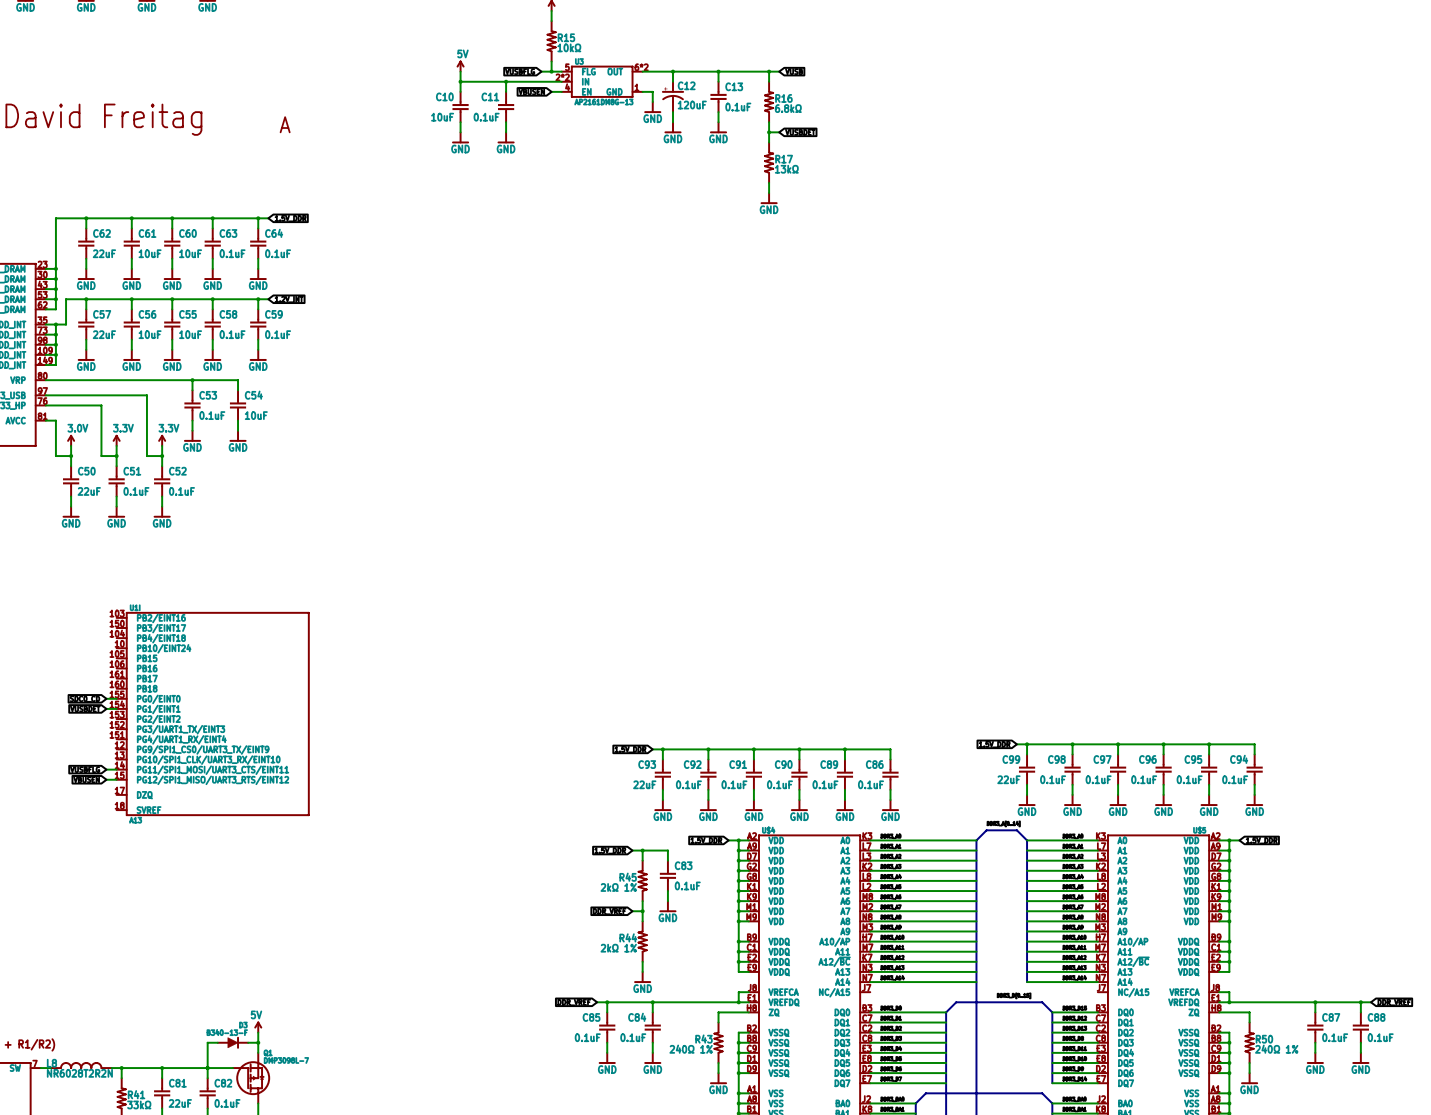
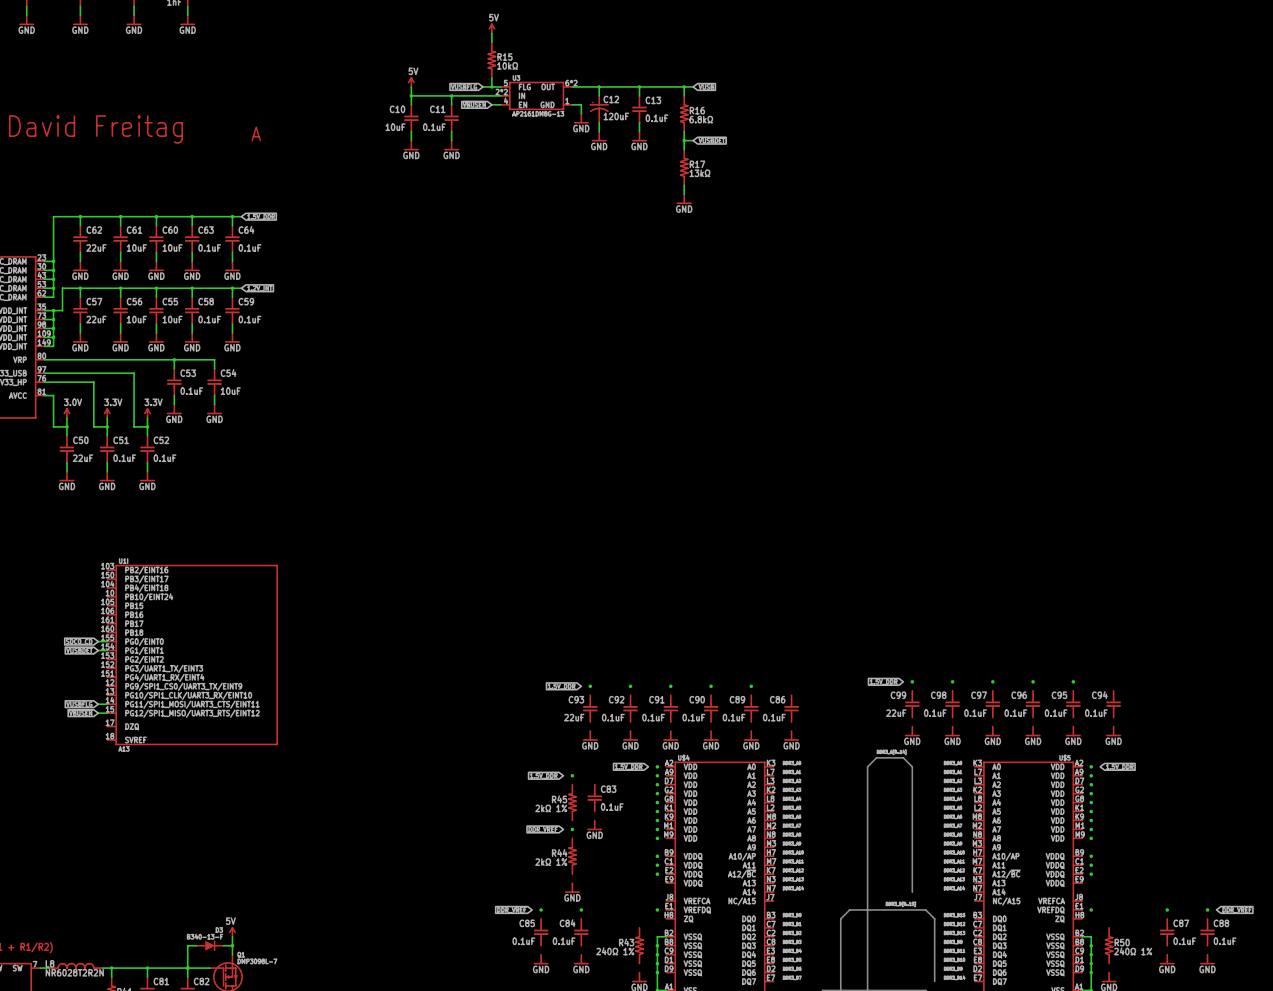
wire: (1016, 744) (1254, 744) (1254, 754) -> none
wire: (1027, 744) (1027, 754) -> none
wire: (1072, 744) (1072, 754) -> none
wire: (1118, 744) (1118, 754) -> none
wire: (1163, 744) (1163, 754) -> none
wire: (1209, 744) (1209, 754) -> none
wire: (652, 749) (890, 749) (890, 759) -> none
wire: (662, 749) (662, 759) -> none
wire: (708, 749) (708, 759) -> none
wire: (753, 749) (753, 759) -> none
wire: (799, 749) (799, 759) -> none
wire: (844, 749) (844, 759) -> none
wire: (1027, 784) (1027, 794) -> none
wire: (1072, 784) (1072, 794) -> none
wire: (1118, 784) (1118, 794) -> none
wire: (1163, 784) (1163, 794) -> none
wire: (1209, 784) (1209, 794) -> none
wire: (1254, 784) (1254, 794) -> none
wire: (662, 789) (662, 799) -> none
wire: (708, 789) (708, 799) -> none
wire: (753, 789) (753, 799) -> none
wire: (799, 789) (799, 799) -> none
wire: (844, 789) (844, 799) -> none
wire: (890, 789) (890, 799) -> none
wire: (728, 840) (748, 840) -> none
wire: (738, 840) (738, 971) (748, 971) -> none
wire: (870, 840) (976, 840) -> none
wire: (1027, 840) (1097, 840) -> none
wire: (1219, 840) (1239, 840) -> none
wire: (1229, 840) (1229, 971) (1219, 971) -> none
wire: (632, 850) (667, 850) (667, 860) -> none
wire: (642, 850) (642, 860) -> none
wire: (738, 850) (748, 850) -> none
wire: (870, 850) (976, 850) -> none
wire: (1027, 850) (1097, 850) -> none
wire: (1219, 850) (1229, 850) -> none
wire: (738, 860) (748, 860) -> none
wire: (870, 860) (976, 860) -> none
wire: (1027, 860) (1097, 860) -> none
wire: (1219, 860) (1229, 860) -> none
wire: (738, 870) (748, 870) -> none
wire: (870, 870) (976, 870) -> none
wire: (1027, 870) (1097, 870) -> none
wire: (1219, 870) (1229, 870) -> none
wire: (738, 880) (748, 880) -> none
wire: (870, 880) (976, 880) -> none
wire: (1027, 880) (1097, 880) -> none
wire: (1219, 880) (1229, 880) -> none
wire: (667, 891) (667, 901) -> none
wire: (738, 891) (748, 891) -> none
wire: (870, 891) (976, 891) -> none
wire: (1027, 891) (1097, 891) -> none
wire: (1219, 891) (1229, 891) -> none
wire: (642, 901) (642, 921) -> none
wire: (738, 901) (748, 901) -> none
wire: (870, 901) (976, 901) -> none
wire: (1027, 901) (1097, 901) -> none
wire: (1219, 901) (1229, 901) -> none
wire: (632, 911) (642, 911) -> none
wire: (738, 911) (748, 911) -> none
wire: (870, 911) (976, 911) -> none
wire: (1027, 911) (1097, 911) -> none
wire: (1219, 911) (1229, 911) -> none
wire: (738, 921) (748, 921) -> none
wire: (870, 921) (976, 921) -> none
wire: (1027, 921) (1097, 921) -> none
wire: (1219, 921) (1229, 921) -> none
wire: (870, 931) (976, 931) -> none
wire: (1027, 931) (1097, 931) -> none
wire: (738, 941) (748, 941) -> none
wire: (870, 941) (976, 941) -> none
wire: (1027, 941) (1097, 941) -> none
wire: (1219, 941) (1229, 941) -> none
wire: (738, 951) (748, 951) -> none
wire: (870, 951) (976, 951) -> none
wire: (1027, 951) (1097, 951) -> none
wire: (1219, 951) (1229, 951) -> none
wire: (642, 961) (642, 971) -> none
wire: (738, 961) (748, 961) -> none
wire: (870, 961) (976, 961) -> none
wire: (1027, 961) (1097, 961) -> none
wire: (1219, 961) (1229, 961) -> none
wire: (870, 971) (976, 971) -> none
wire: (1027, 971) (1097, 971) -> none
wire: (870, 982) (976, 982) -> none
wire: (1027, 982) (1097, 982) -> none
wire: (748, 992) (738, 992) (738, 1002) -> none
wire: (1219, 992) (1229, 992) (1229, 1002) -> none
wire: (597, 1002) (748, 1002) -> none
wire: (607, 1002) (607, 1012) -> none
wire: (652, 1002) (652, 1012) -> none
wire: (1219, 1002) (1370, 1002) -> none
wire: (1315, 1002) (1315, 1012) -> none
wire: (1360, 1002) (1360, 1012) -> none
wire: (748, 1012) (718, 1012) (718, 1022) -> none
wire: (870, 1012) (946, 1012) -> none
wire: (1052, 1012) (1097, 1012) -> none
wire: (1219, 1012) (1249, 1012) (1249, 1022) -> none
wire: (870, 1022) (946, 1022) -> none
wire: (1052, 1022) (1097, 1022) -> none
wire: (870, 1032) (946, 1032) -> none
wire: (1052, 1032) (1097, 1032) -> none
wire: (607, 1042) (607, 1052) -> none
wire: (652, 1042) (652, 1052) -> none
wire: (738, 1042) (748, 1042) -> none
wire: (870, 1042) (946, 1042) -> none
wire: (1052, 1042) (1097, 1042) -> none
wire: (1219, 1042) (1229, 1042) -> none
wire: (1315, 1042) (1315, 1052) -> none
wire: (1360, 1042) (1360, 1052) -> none
wire: (738, 1052) (748, 1052) -> none
wire: (870, 1052) (946, 1052) -> none
wire: (1052, 1052) (1097, 1052) -> none
wire: (1219, 1052) (1229, 1052) -> none
wire: (718, 1062) (718, 1073) -> none
wire: (738, 1062) (748, 1062) -> none
wire: (870, 1062) (946, 1062) -> none
wire: (1052, 1062) (1097, 1062) -> none
wire: (1219, 1062) (1229, 1062) -> none
wire: (1249, 1062) (1249, 1073) -> none
wire: (738, 1073) (748, 1073) -> none
wire: (870, 1073) (946, 1073) -> none
wire: (1052, 1073) (1097, 1073) -> none
wire: (1219, 1073) (1229, 1073) -> none
wire: (870, 1083) (946, 1083) -> none
wire: (1052, 1083) (1097, 1083) -> none

